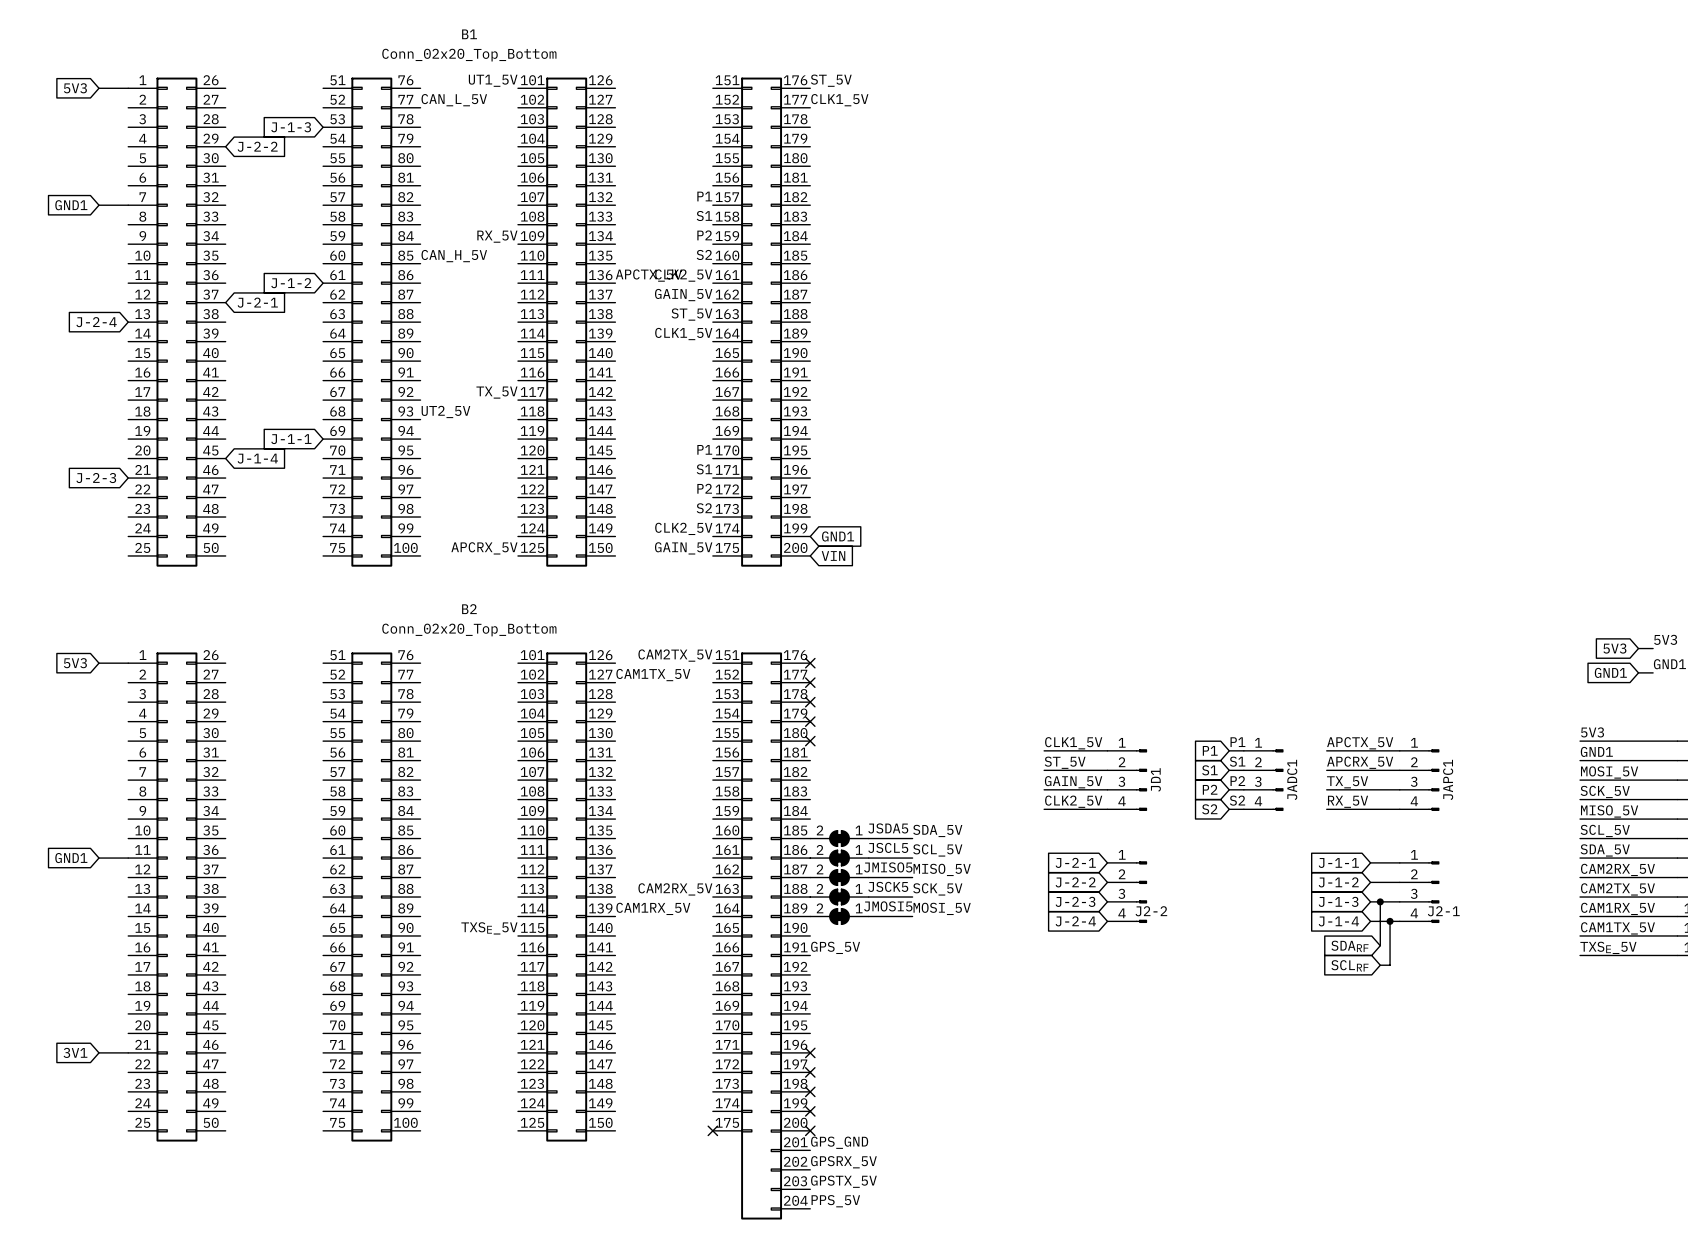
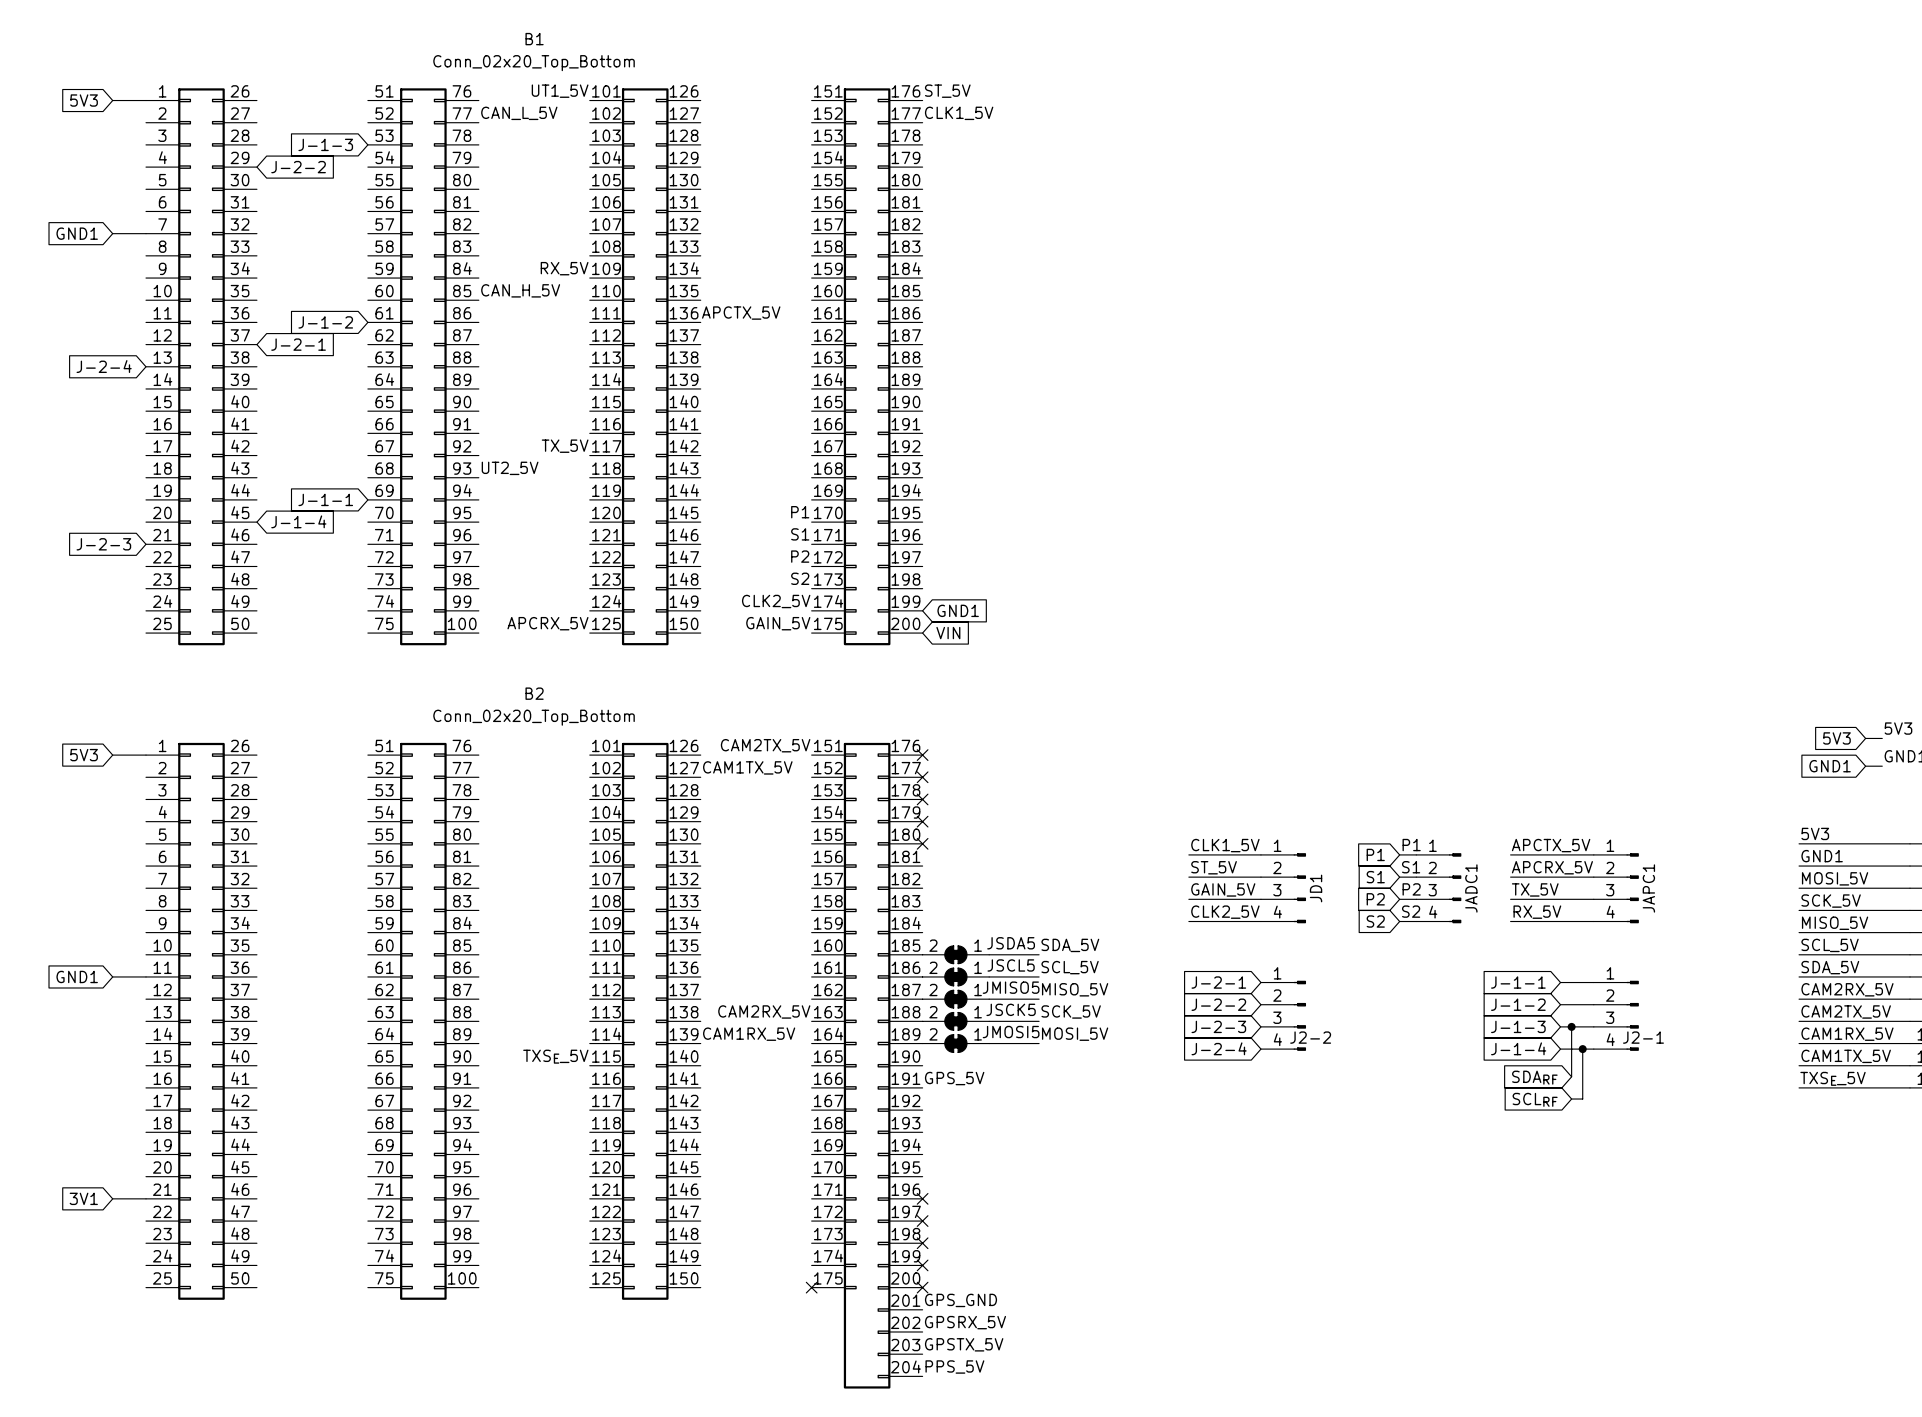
label: P1 (704, 196) -> none
label: S1 (704, 216) -> none
label: P2 (704, 235) -> none
label: S2 (704, 254) -> none
label: CLK2_5V (683, 275) -> none
label: GAIN_5V (683, 295) -> none
label: ST_5V (691, 314) -> none
label: CLK1_5V (683, 334) -> none

